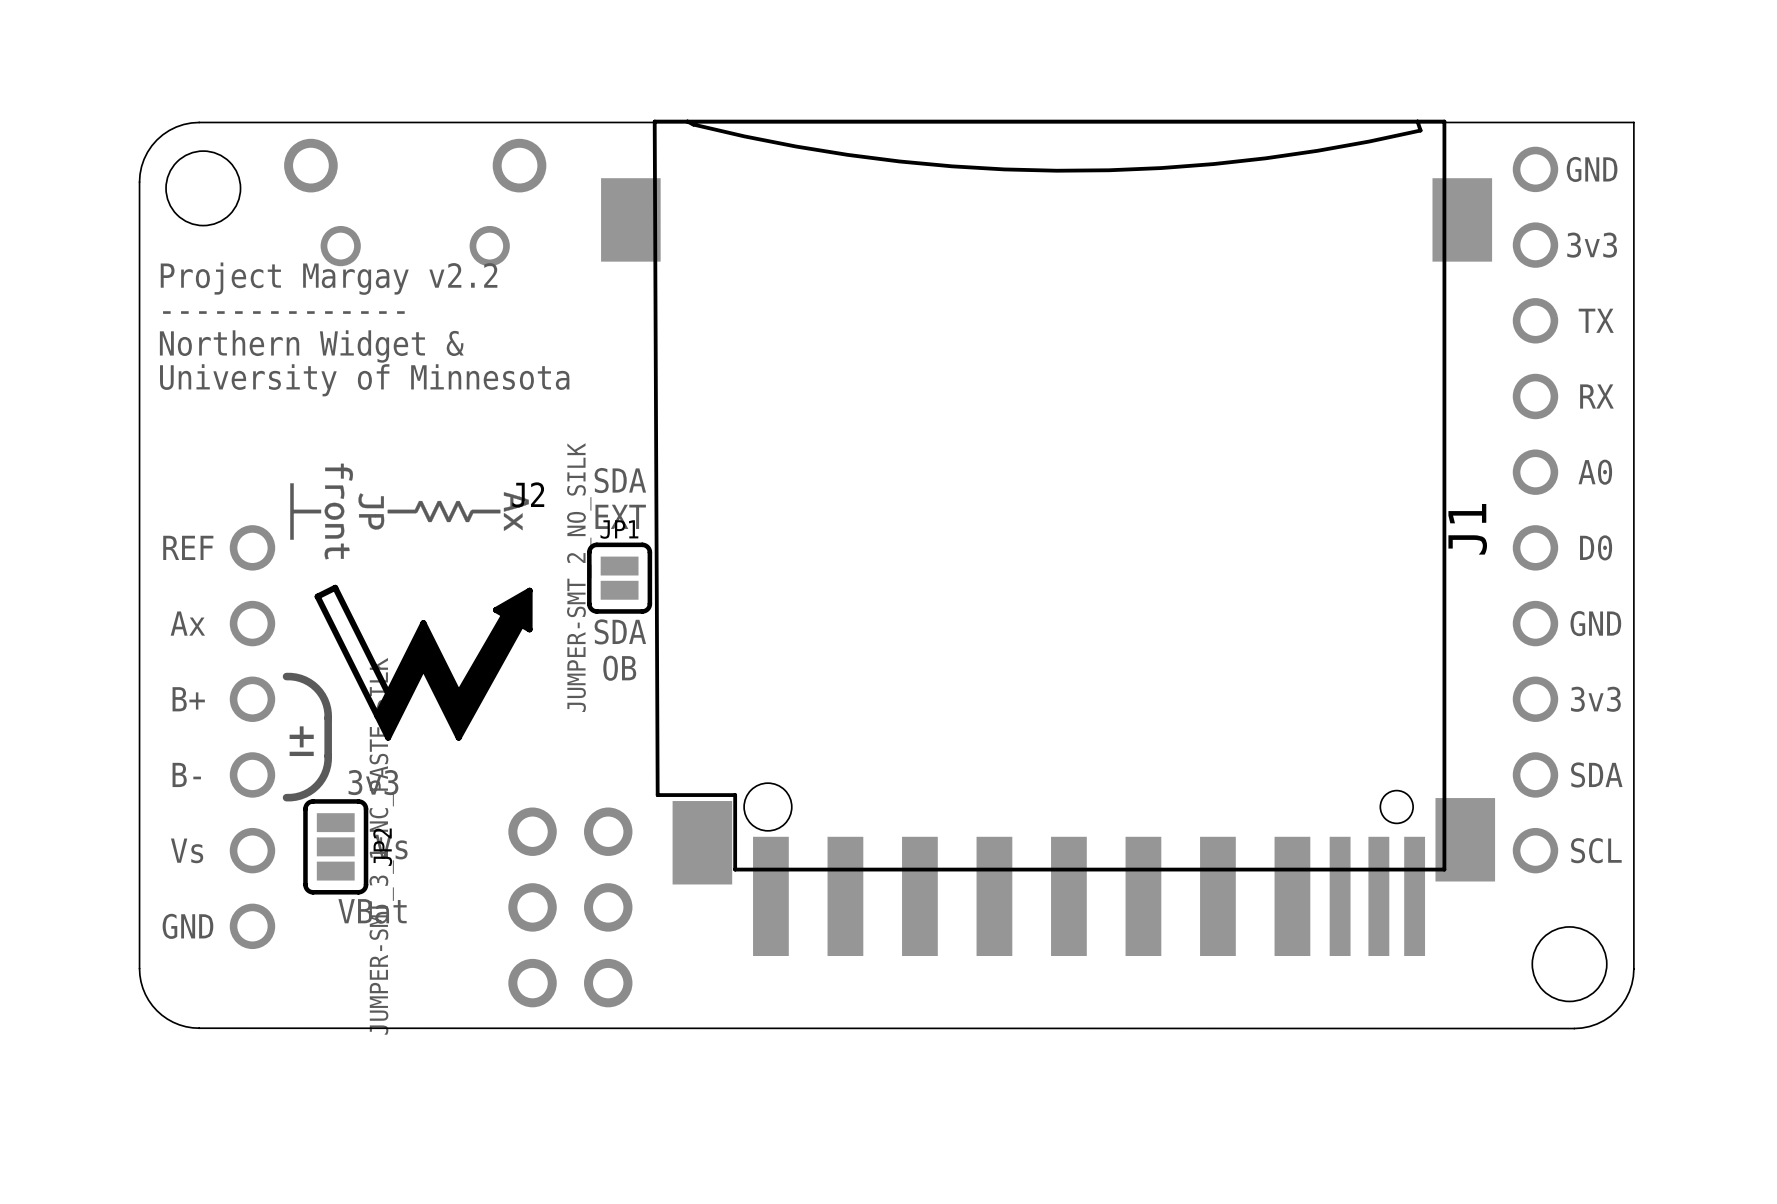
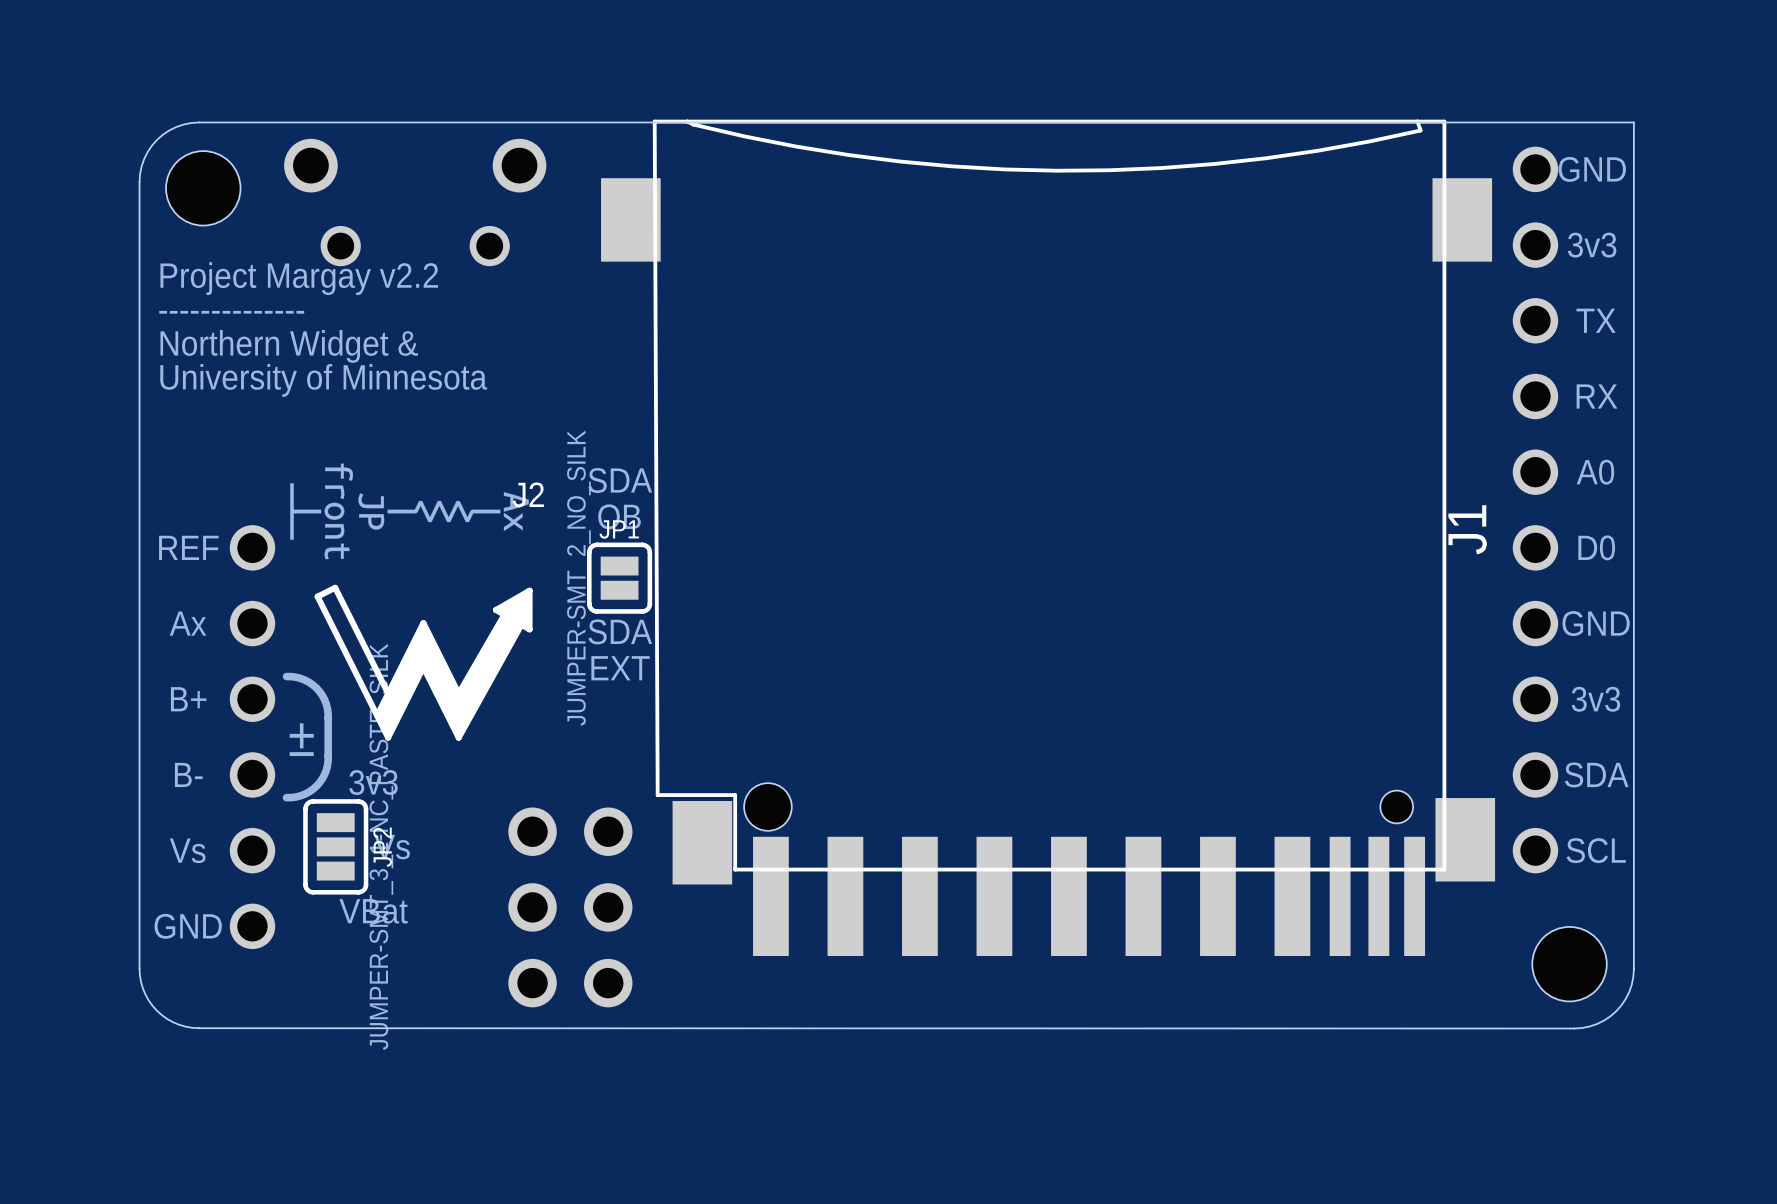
text: EXT (620, 516) -> OB (619, 516)
text: OB (619, 668) -> EXT (620, 668)

